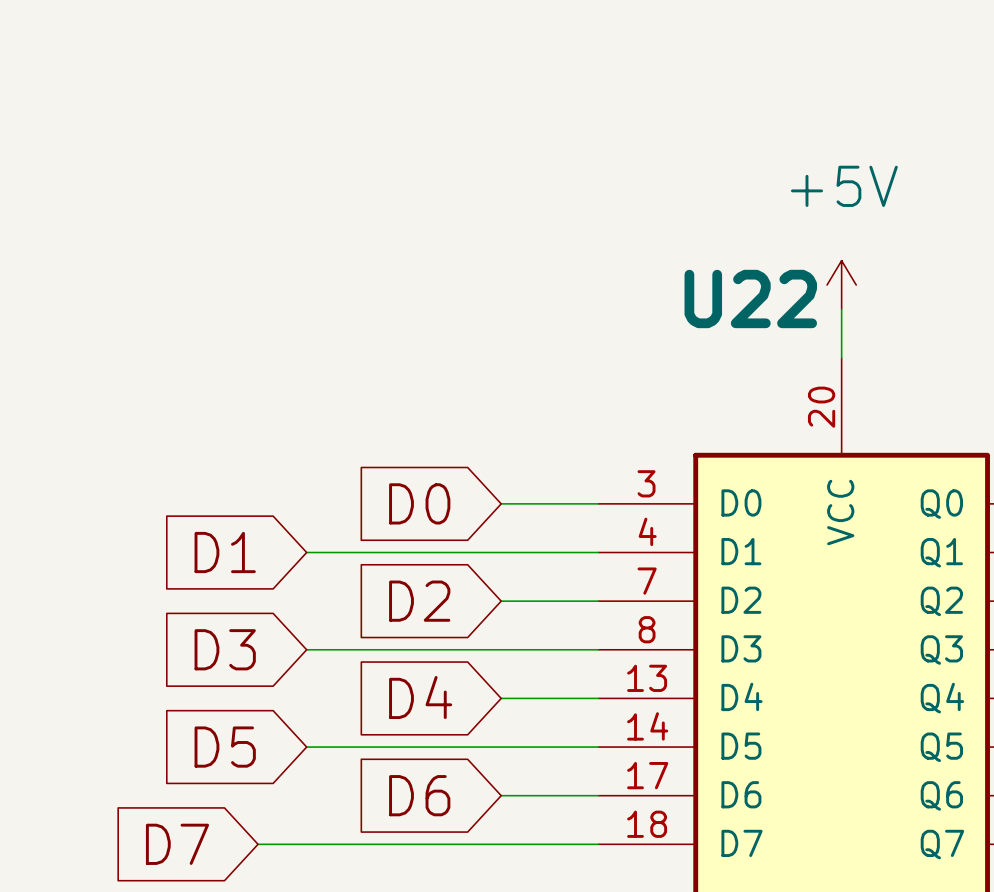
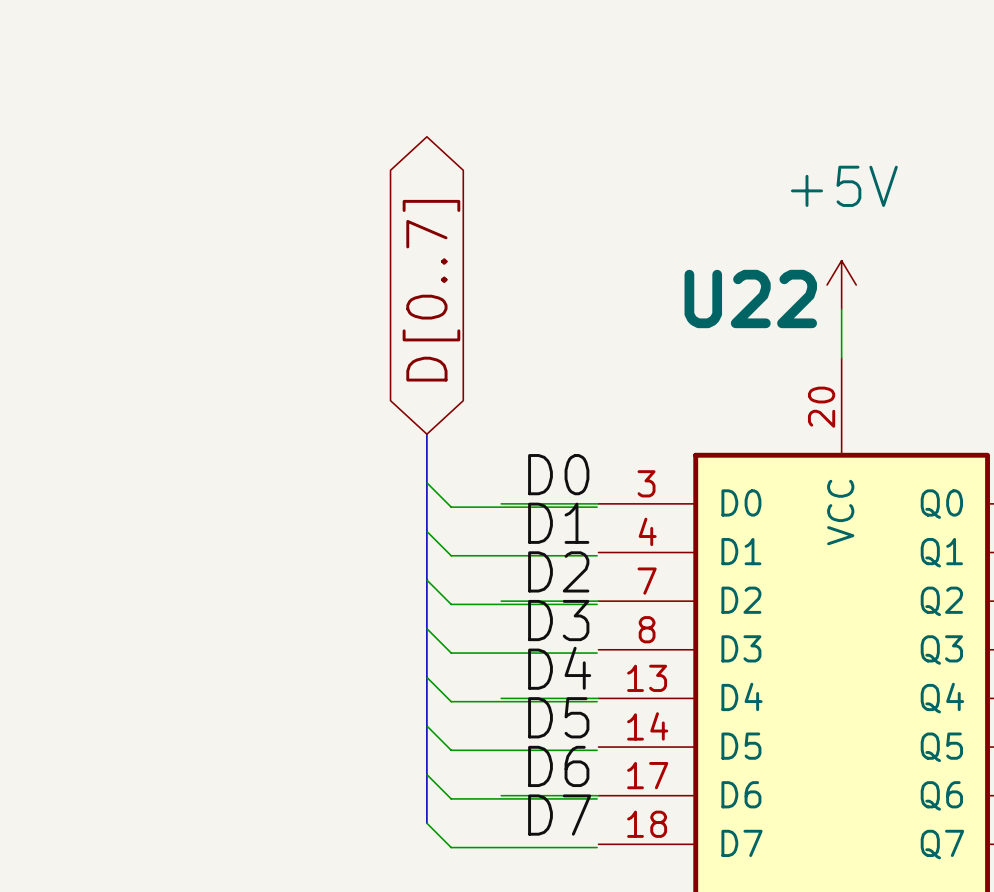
global label: none -> D[0..7] (431, 290)
bus: none -> (426, 434) (426, 823)
label: none -> D0 (558, 474)
wire: none -> (426, 482) (451, 507) (597, 507)
global label: D0 (419, 503) -> none
label: none -> D1 (558, 523)
wire: none -> (426, 531) (451, 555) (597, 555)
global label: D1 (225, 552) -> none
wire: (306, 552) (598, 552) -> none
label: none -> D2 (558, 571)
wire: none -> (426, 580) (451, 604) (597, 604)
global label: D2 (419, 601) -> none
label: none -> D3 (558, 620)
wire: none -> (426, 628) (451, 653) (597, 653)
global label: D3 (225, 649) -> none
wire: (306, 649) (598, 649) -> none
label: none -> D4 (559, 668)
wire: none -> (426, 677) (451, 701) (597, 701)
global label: D4 (420, 697) -> none
label: none -> D5 (558, 717)
wire: none -> (426, 725) (451, 750) (597, 750)
global label: D5 (225, 747) -> none
wire: (306, 747) (598, 747) -> none
label: none -> D6 (558, 766)
wire: none -> (426, 774) (451, 798) (597, 798)
global label: D6 (419, 795) -> none
label: none -> D7 (559, 815)
wire: none -> (426, 823) (451, 847) (597, 847)
global label: D7 (177, 844) -> none
wire: (258, 844) (598, 844) -> none

